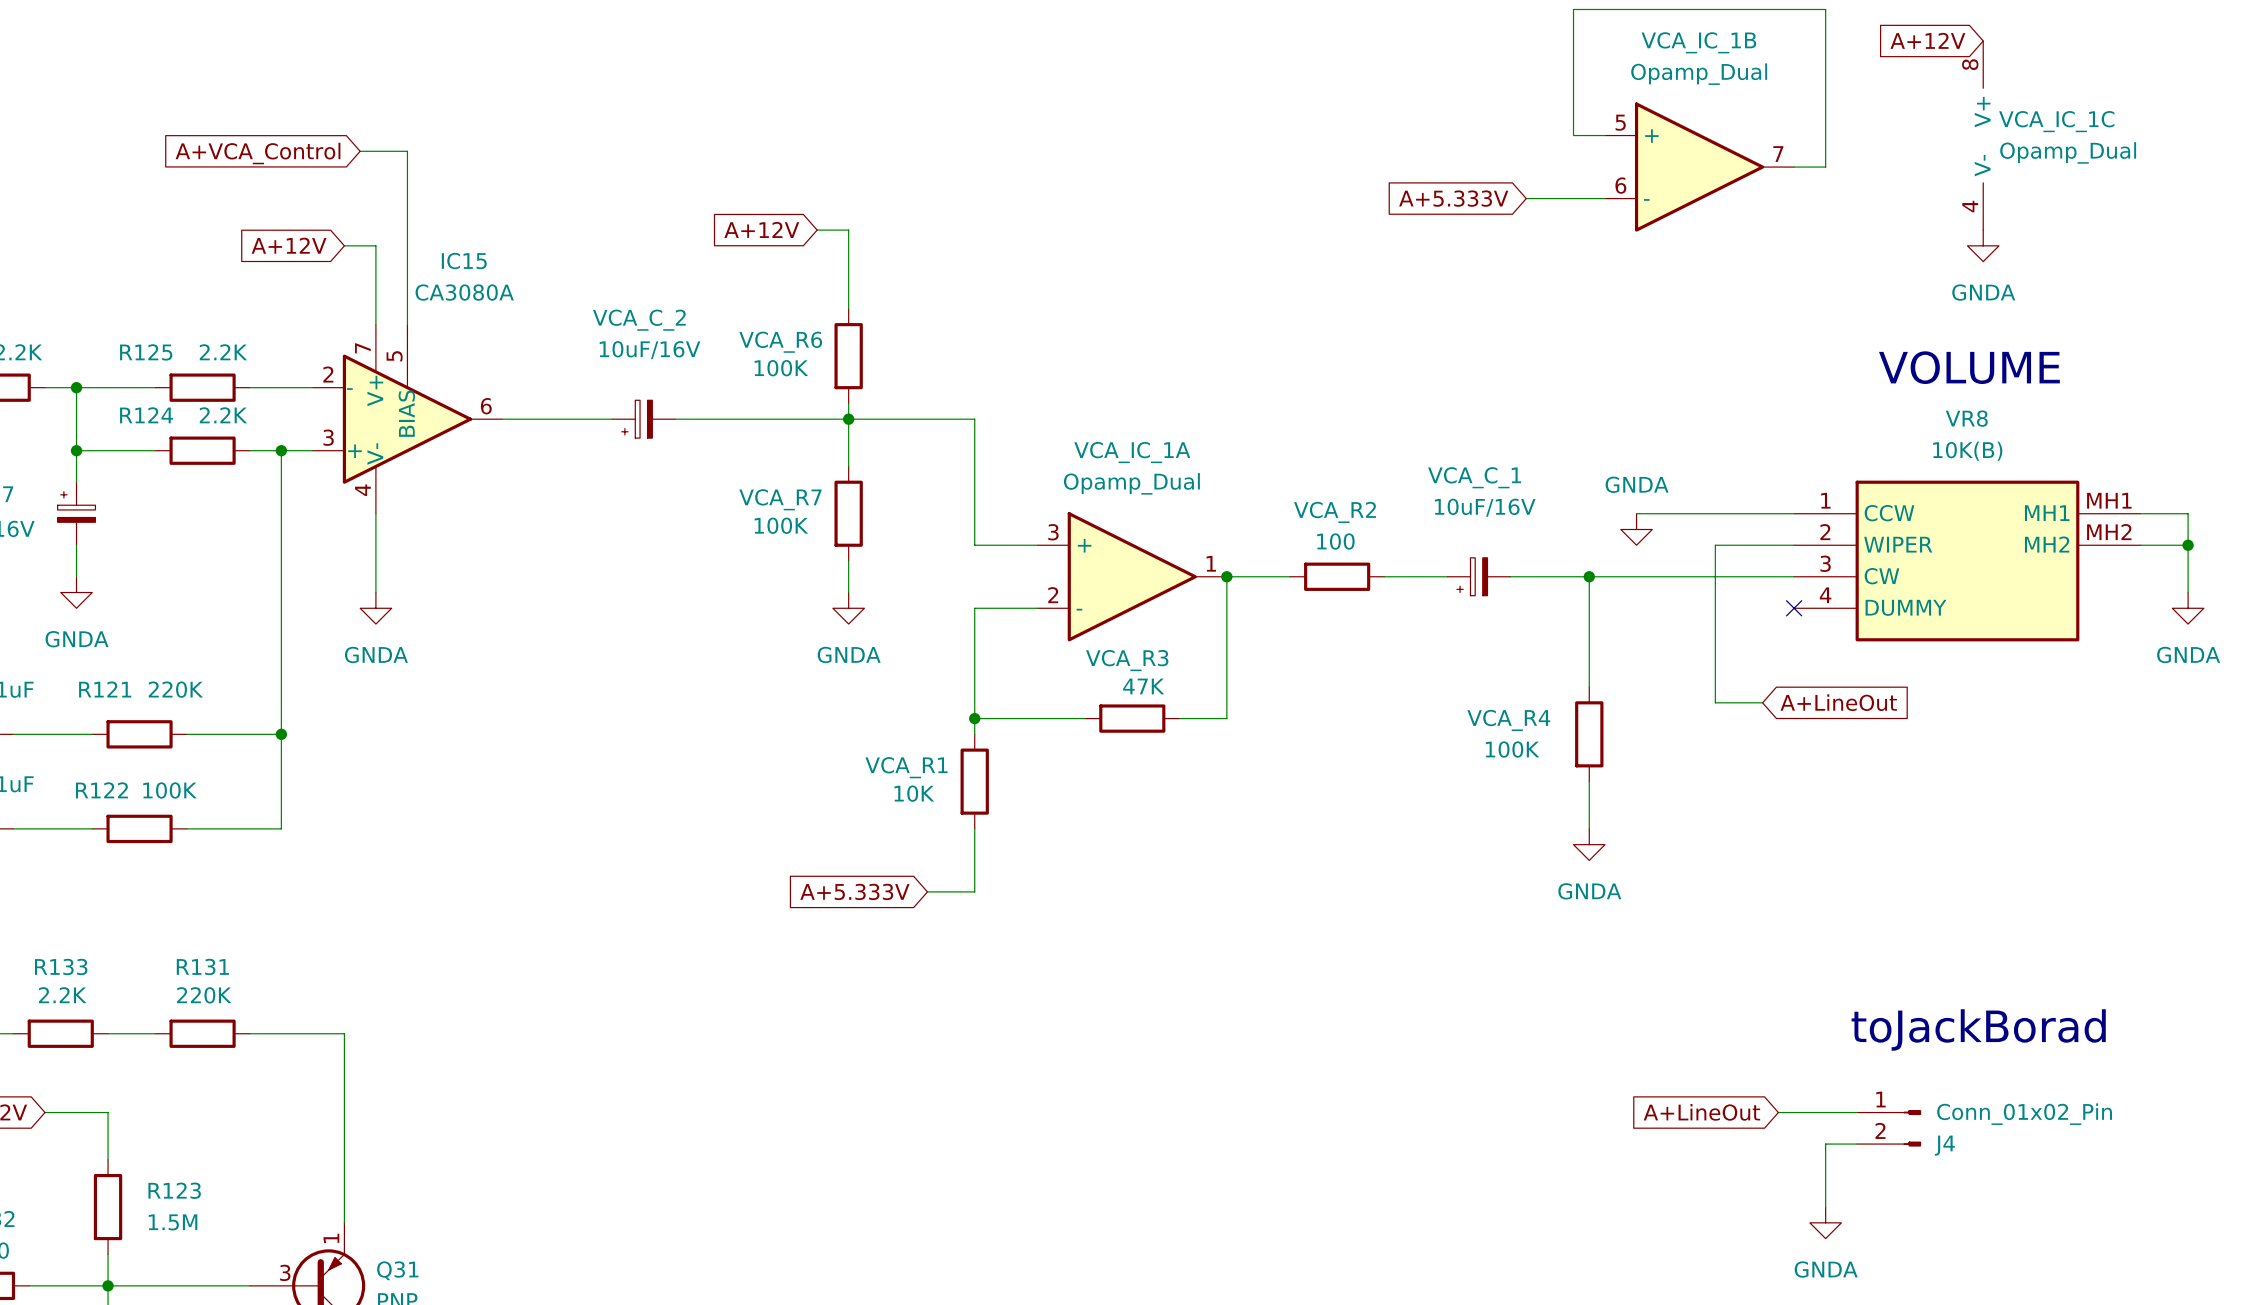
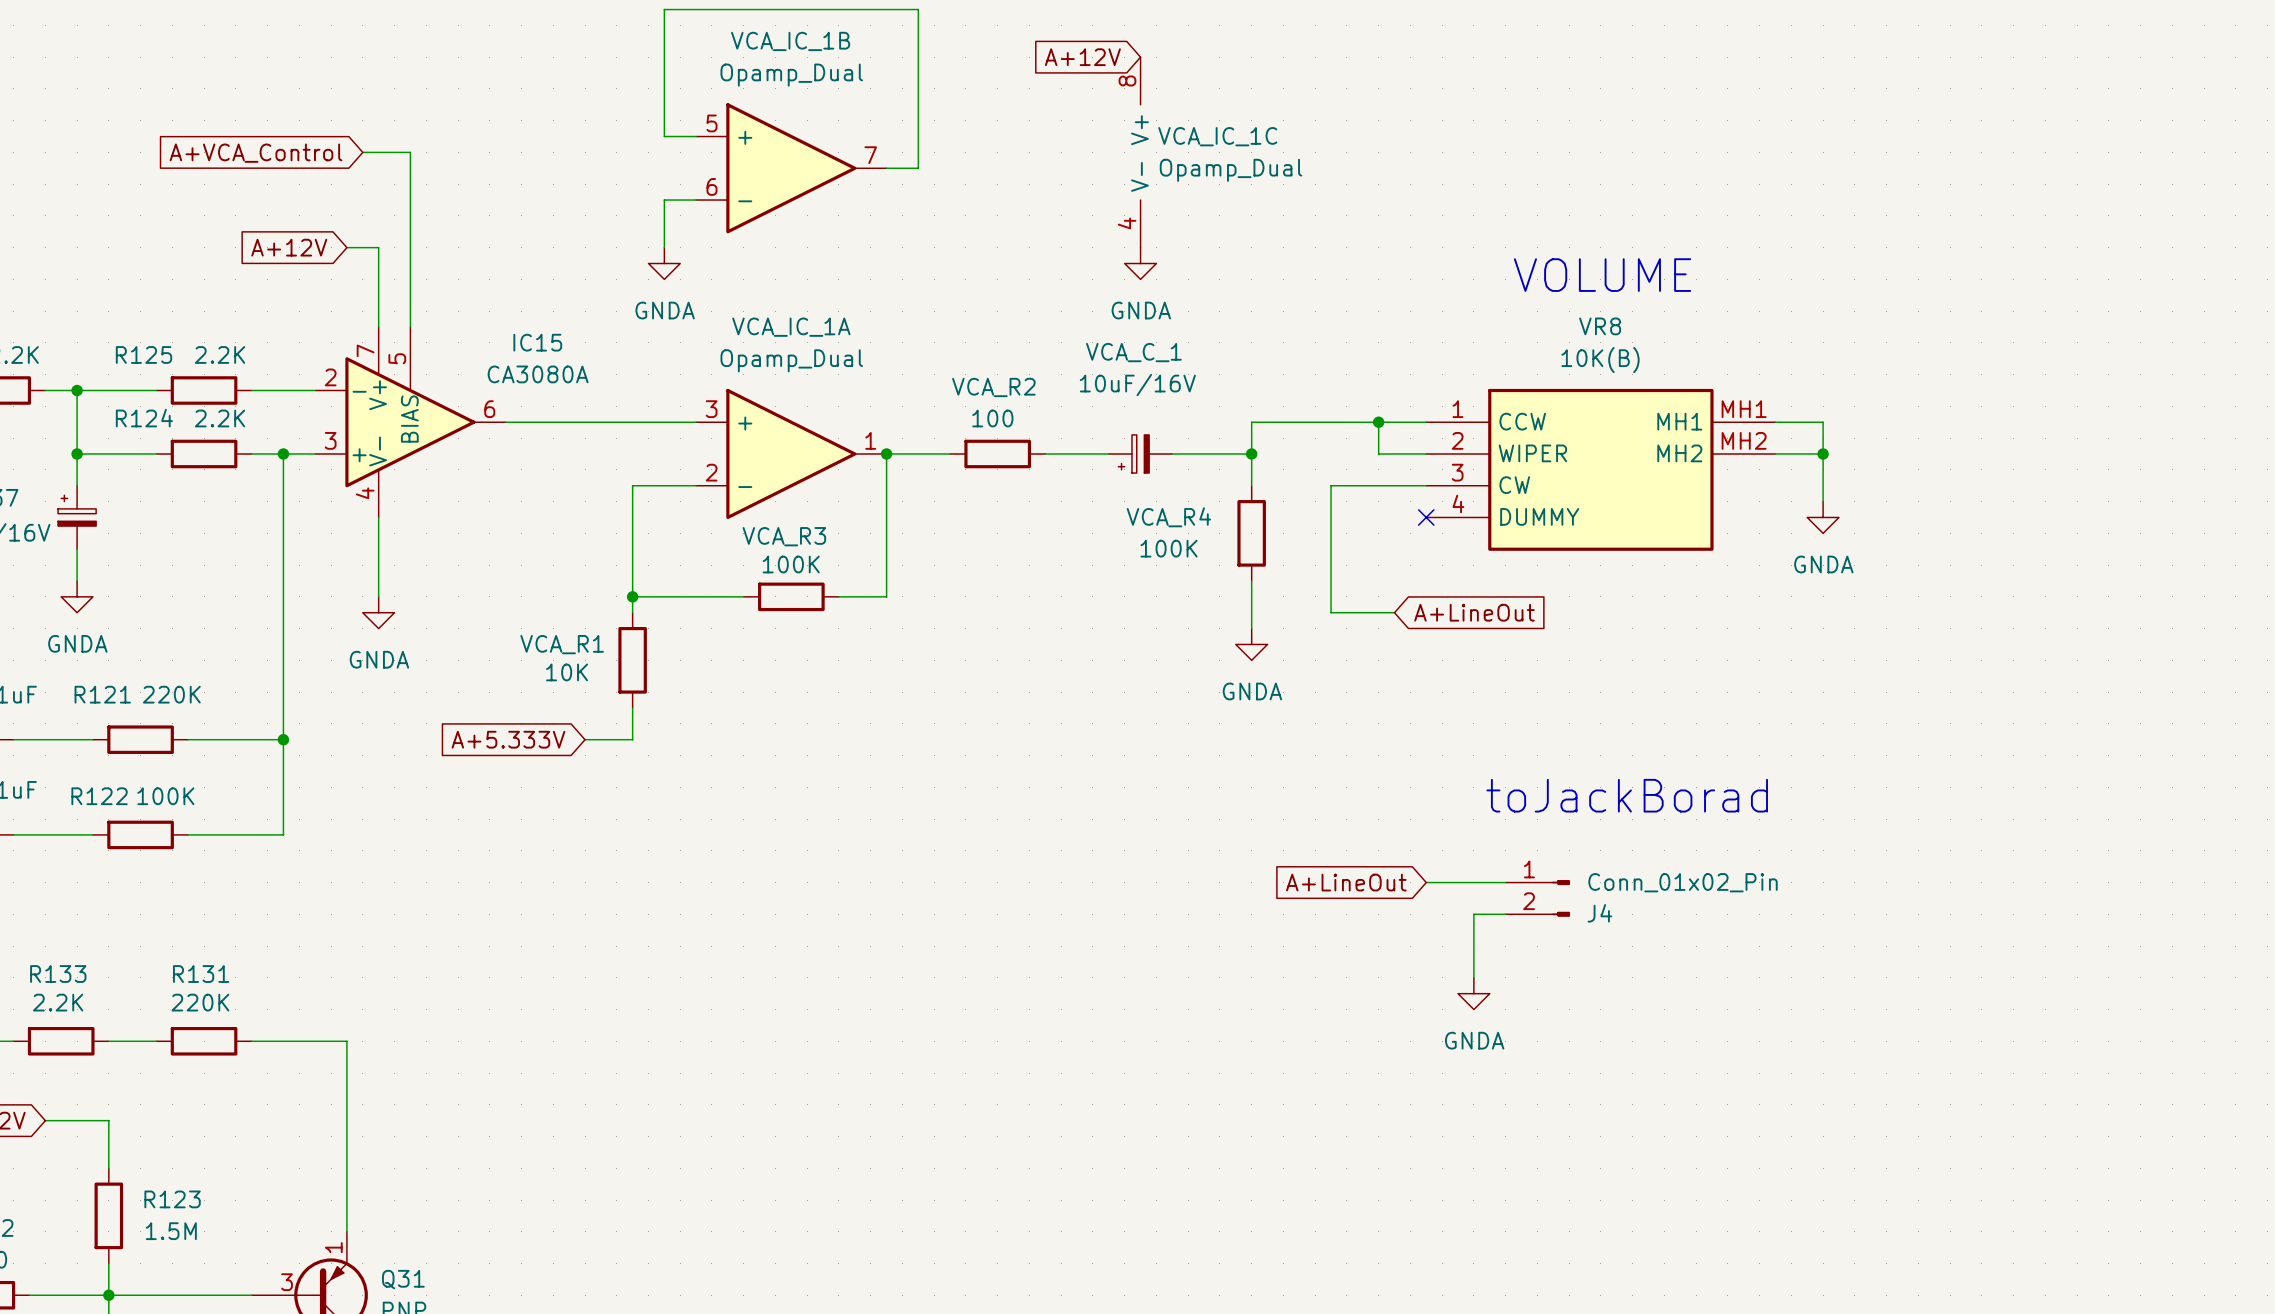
global label: A+12V (1927, 40) -> none
global label: none -> A+12V (1082, 57)
wire: none -> (696, 136) (664, 136) (664, 9) (918, 9) (918, 168) (886, 168)
wire: (1605, 135) (1573, 135) (1573, 9) (1825, 9) (1825, 167) (1794, 167) -> none
VCA_IC_1C position: (1983, 135) -> (1140, 152)
VCA_IC_1B position: (1699, 167) -> (791, 168)
wire: none -> (696, 200) (664, 200) (664, 247)
global label: A+5.333V (1453, 198) -> none
wire: (1526, 198) (1605, 198) -> none
global label: A+12V (761, 229) -> none
wire: (817, 230) (848, 230) (848, 308) -> none
power symbol: GNDA (1983, 245) -> none
IC15 name position: IC15 (464, 261) -> IC15 (537, 342)
power symbol: none -> GNDA (664, 263)
power symbol: none -> GNDA (1140, 263)
text: none -> VOLUME (1602, 275)
IC15 value position: CA3080A (464, 292) -> CA3080A (538, 374)
VCA_R6: 100K (848, 356) -> none
text: VOLUME (1969, 367) -> none
wire: (848, 403) (848, 466) -> none
VCA_C_2: 10uF/16V (643, 419) -> none
wire: (691, 419) (974, 419) (974, 545) (1037, 545) -> none
junction position: (848, 419) -> (886, 453)
wire: none -> (1378, 422) (1378, 453) (1426, 453)
junction: none -> (1378, 422)
wire: none -> (1426, 422) (1251, 422) (1251, 485)
wire: none -> (1775, 422) (1823, 422) (1823, 501)
wire: none -> (950, 453) (886, 453) (886, 596) (838, 596)
wire: none -> (1045, 453) (1108, 453)
wire: none -> (1172, 453) (1251, 453)
junction: none -> (1251, 453)
wire: none -> (1775, 453) (1823, 453)
junction: none -> (1823, 453)
wire: none -> (696, 485) (632, 485) (632, 612)
wire: none -> (1426, 485) (1331, 485) (1331, 612) (1394, 612)
VCA_R7: 100K (848, 513) -> none
no-connect mark: none -> (1426, 517)
wire: (1636, 513) (1794, 513) -> none
power symbol: none -> GNDA (1823, 517)
wire: (2140, 513) (2188, 513) (2188, 592) -> none
power symbol: GNDA (1636, 529) -> none
wire: (1794, 545) (1715, 545) (1715, 702) (1762, 702) -> none
wire: (2140, 545) (2188, 545) -> none
junction: (2188, 545) -> none
wire: (848, 561) (848, 592) -> none
VR8 position: (1967, 561) -> (1600, 469)
VCA_IC_1A position: (1132, 576) -> (791, 453)
junction: (1226, 576) -> none
wire: none -> (1251, 580) (1251, 628)
wire: (1289, 576) (1226, 576) (1226, 718) (1179, 718) -> none
VCA_R2 position: (1337, 576) -> (997, 453)
wire: (1384, 576) (1447, 576) -> none
VCA_C_1 position: (1478, 576) -> (1140, 453)
wire: (1510, 576) (1794, 576) -> none
wire: (1589, 576) (1589, 687) -> none
junction: (1589, 576) -> none
wire: none -> (632, 596) (743, 596)
junction: none -> (632, 596)
power symbol: GNDA (848, 608) -> none
wire: (1037, 608) (974, 608) (974, 734) -> none
global label: none -> A+LineOut (1474, 612)
no-connect mark: (1794, 608) -> none
power symbol: GNDA (2188, 608) -> none
power symbol: none -> GNDA (1251, 644)
VCA_R3 value: 47K (1143, 686) -> 100K (791, 564)
wire: none -> (632, 707) (632, 739) (585, 739)
global label: A+LineOut (1838, 702) -> none
wire: (974, 718) (1085, 718) -> none
junction: (974, 718) -> none
VCA_R3 position: (1132, 718) -> (791, 596)
global label: none -> A+5.333V (508, 739)
VCA_R4 position: (1589, 734) -> (1251, 533)
VCA_R1 position: (974, 781) -> (632, 660)
wire: (1589, 781) (1589, 828) -> none
text: none -> toJackBorad (1627, 795)
wire: (974, 828) (974, 891) (927, 891) -> none
power symbol position: GNDA (1589, 844) -> GNDA (1473, 993)
global label: none -> A+LineOut (1346, 882)
wire: none -> (1426, 882) (1505, 882)
global label: A+5.333V (854, 891) -> none
wire: none -> (1505, 914) (1473, 914) (1473, 977)
text: toJackBorad (1978, 1029) -> none
global label: A+LineOut (1701, 1112) -> none
wire: (1778, 1112) (1857, 1112) -> none
J4 position: (1889, 1128) -> (1537, 898)
wire: (1857, 1144) (1825, 1144) (1825, 1207) -> none
power symbol: GNDA (1825, 1222) -> none

